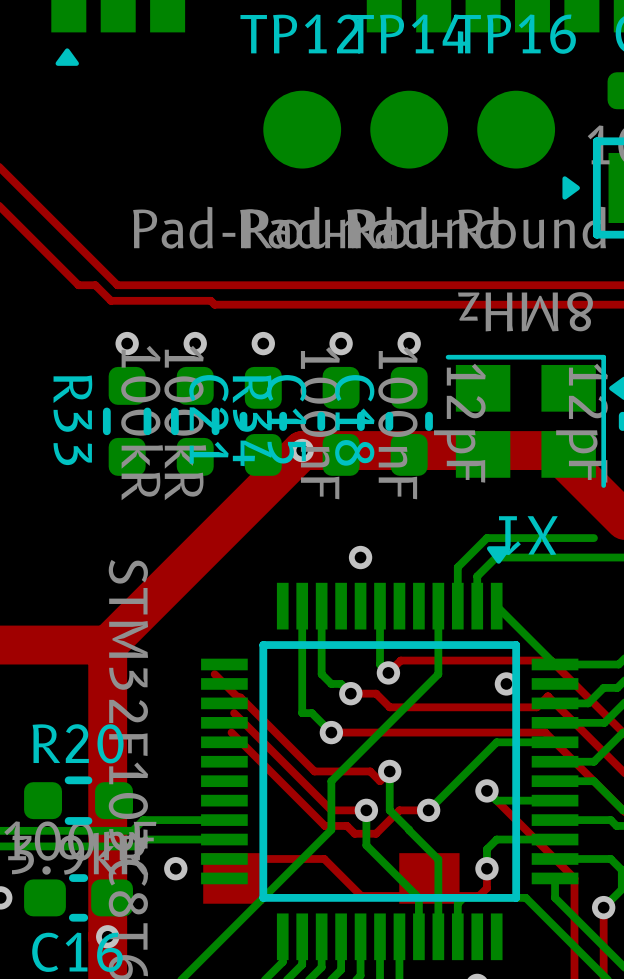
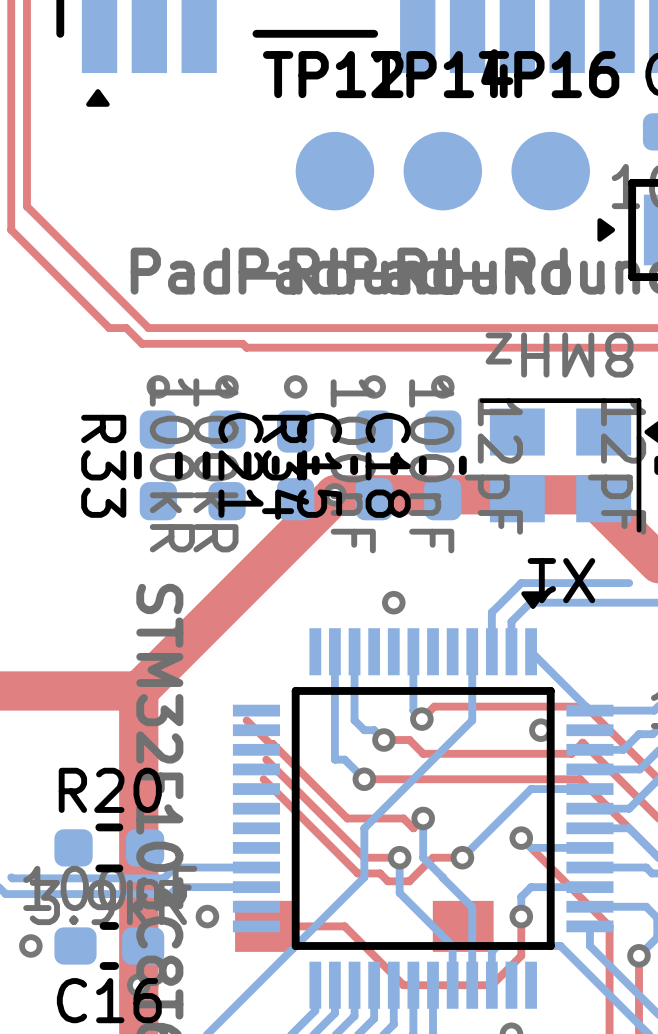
top track: (233, 858) (324, 858) (361, 895) (479, 895) (486, 888) -> (265, 926) (344, 926) (403, 985) (491, 985) (521, 955) (521, 936)

